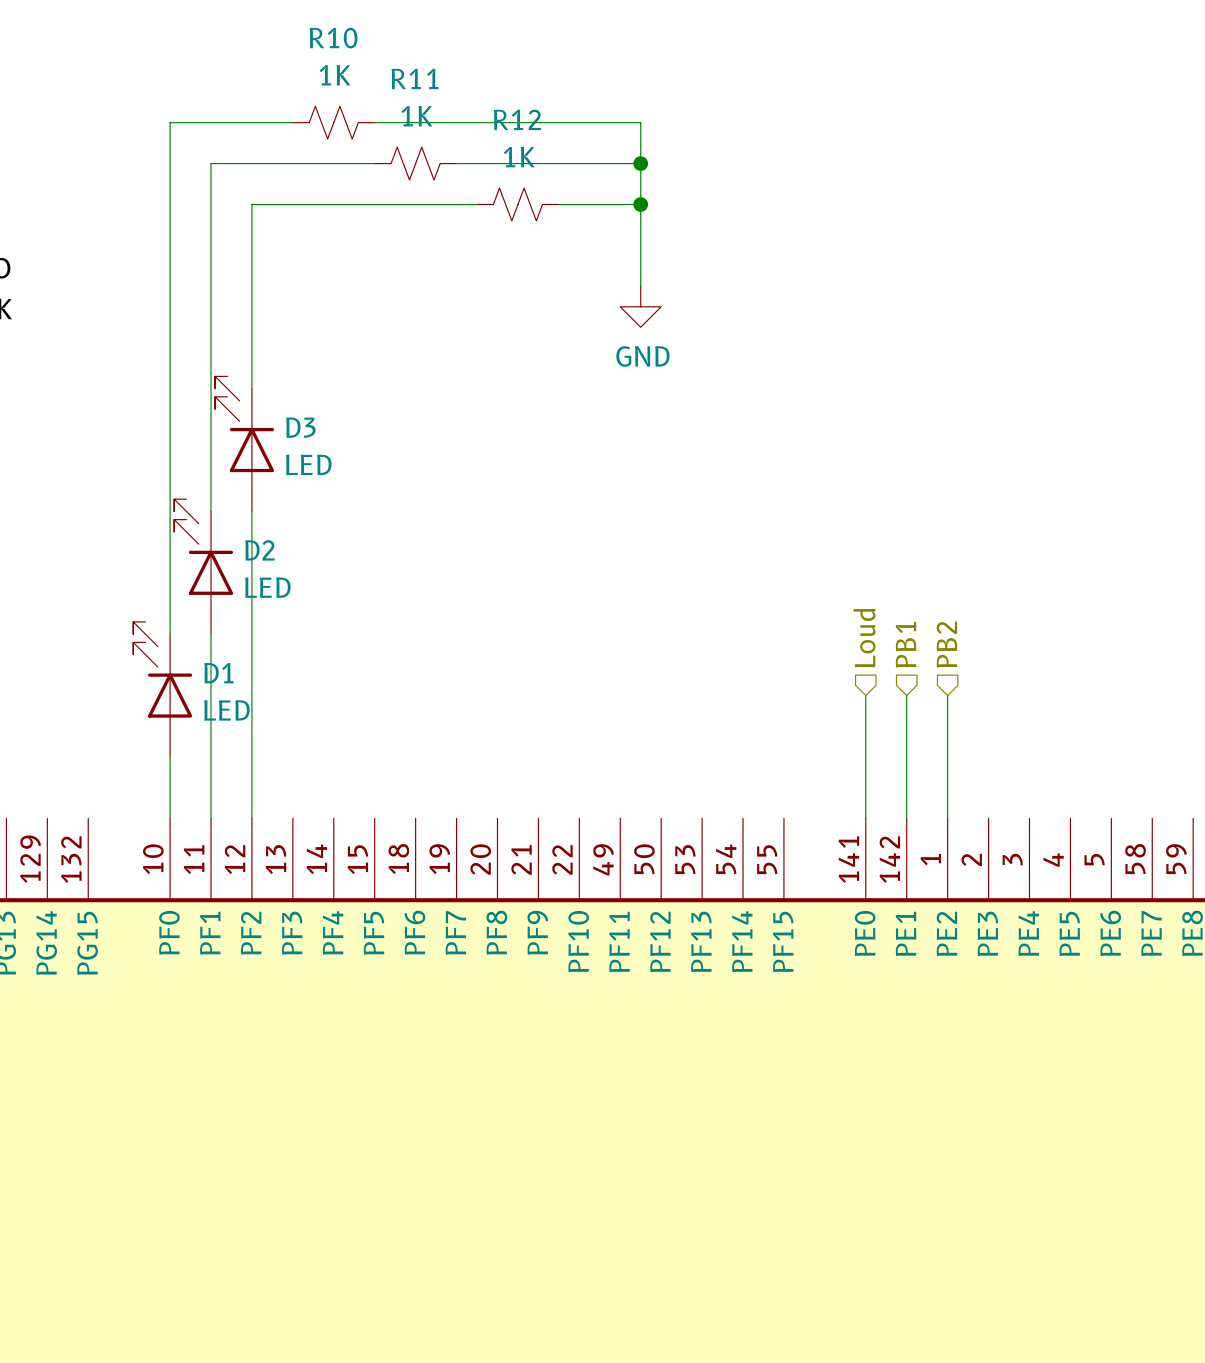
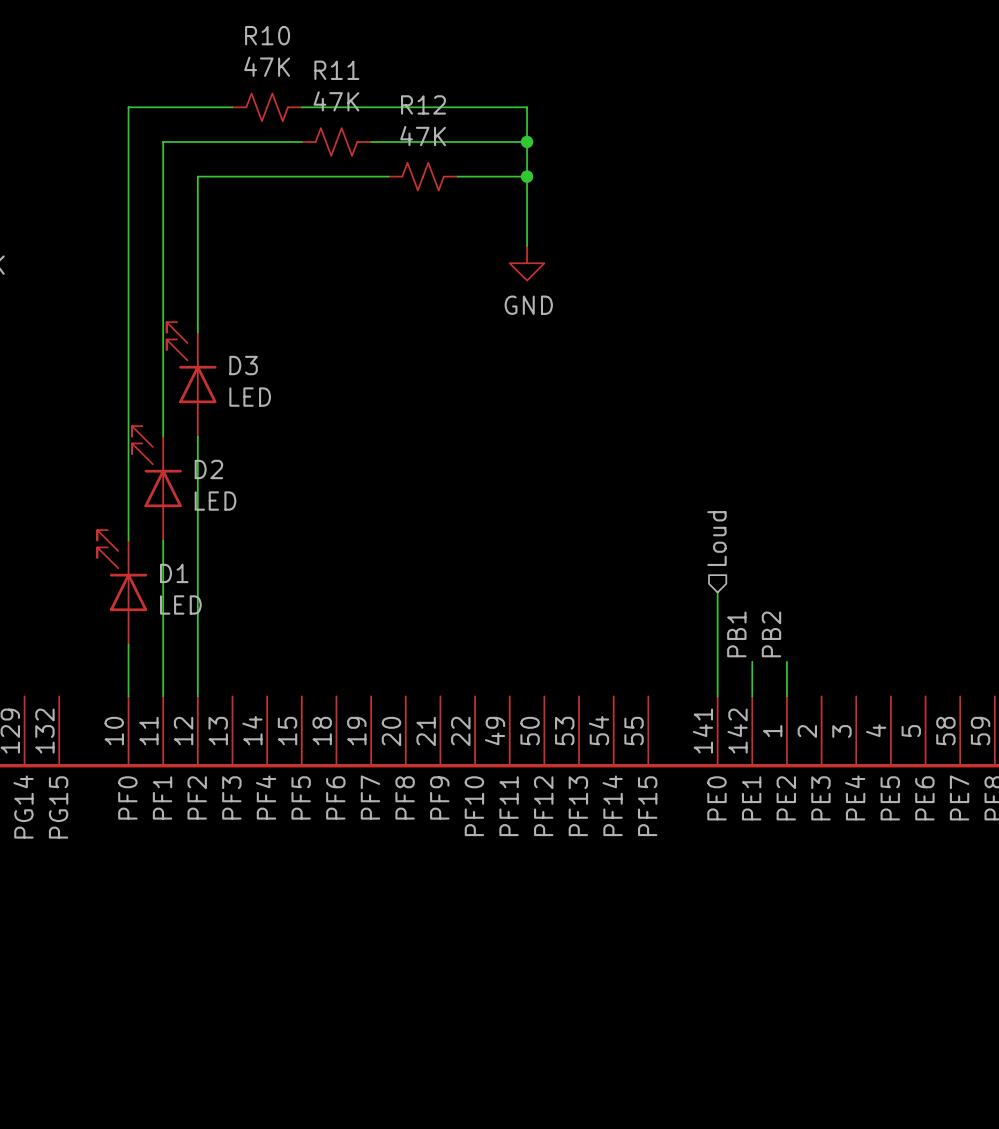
R10 value: 1K (335, 75) -> 47K (267, 66)
R11 value: 1K (416, 116) -> 47K (336, 101)
R12 value: 1K (519, 157) -> 47K (423, 136)
hierarchical label: PB1 (905, 644) -> none
hierarchical label: PB2 (946, 644) -> none
wire: (906, 695) (906, 777) -> none
wire: (947, 695) (947, 777) -> none
label: none -> PB1 (736, 634)
label: none -> PB2 (771, 634)

